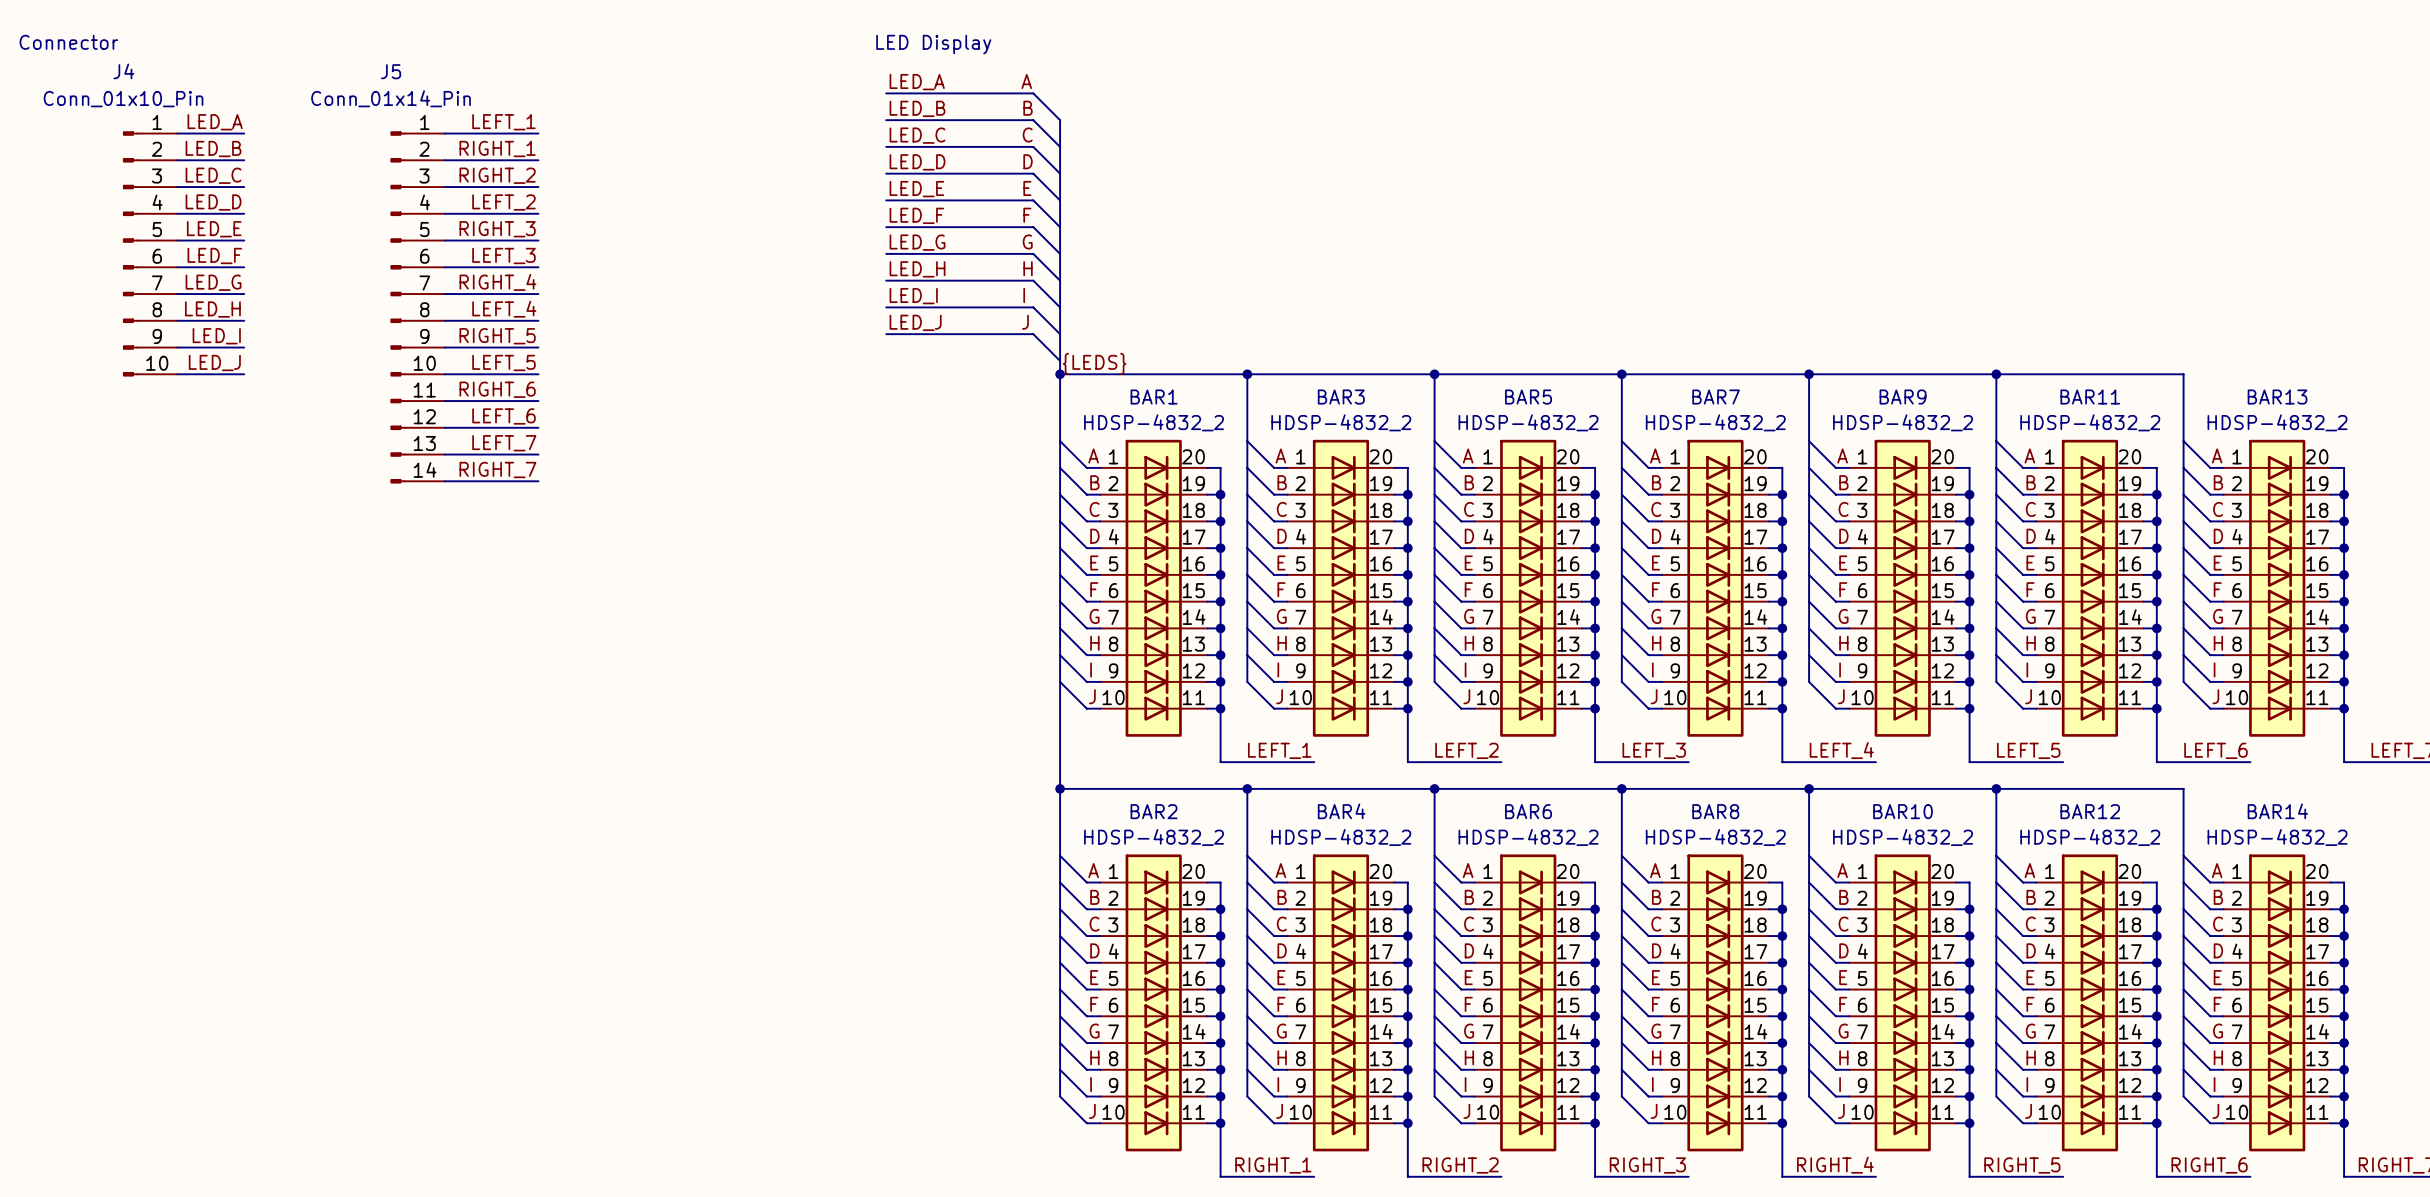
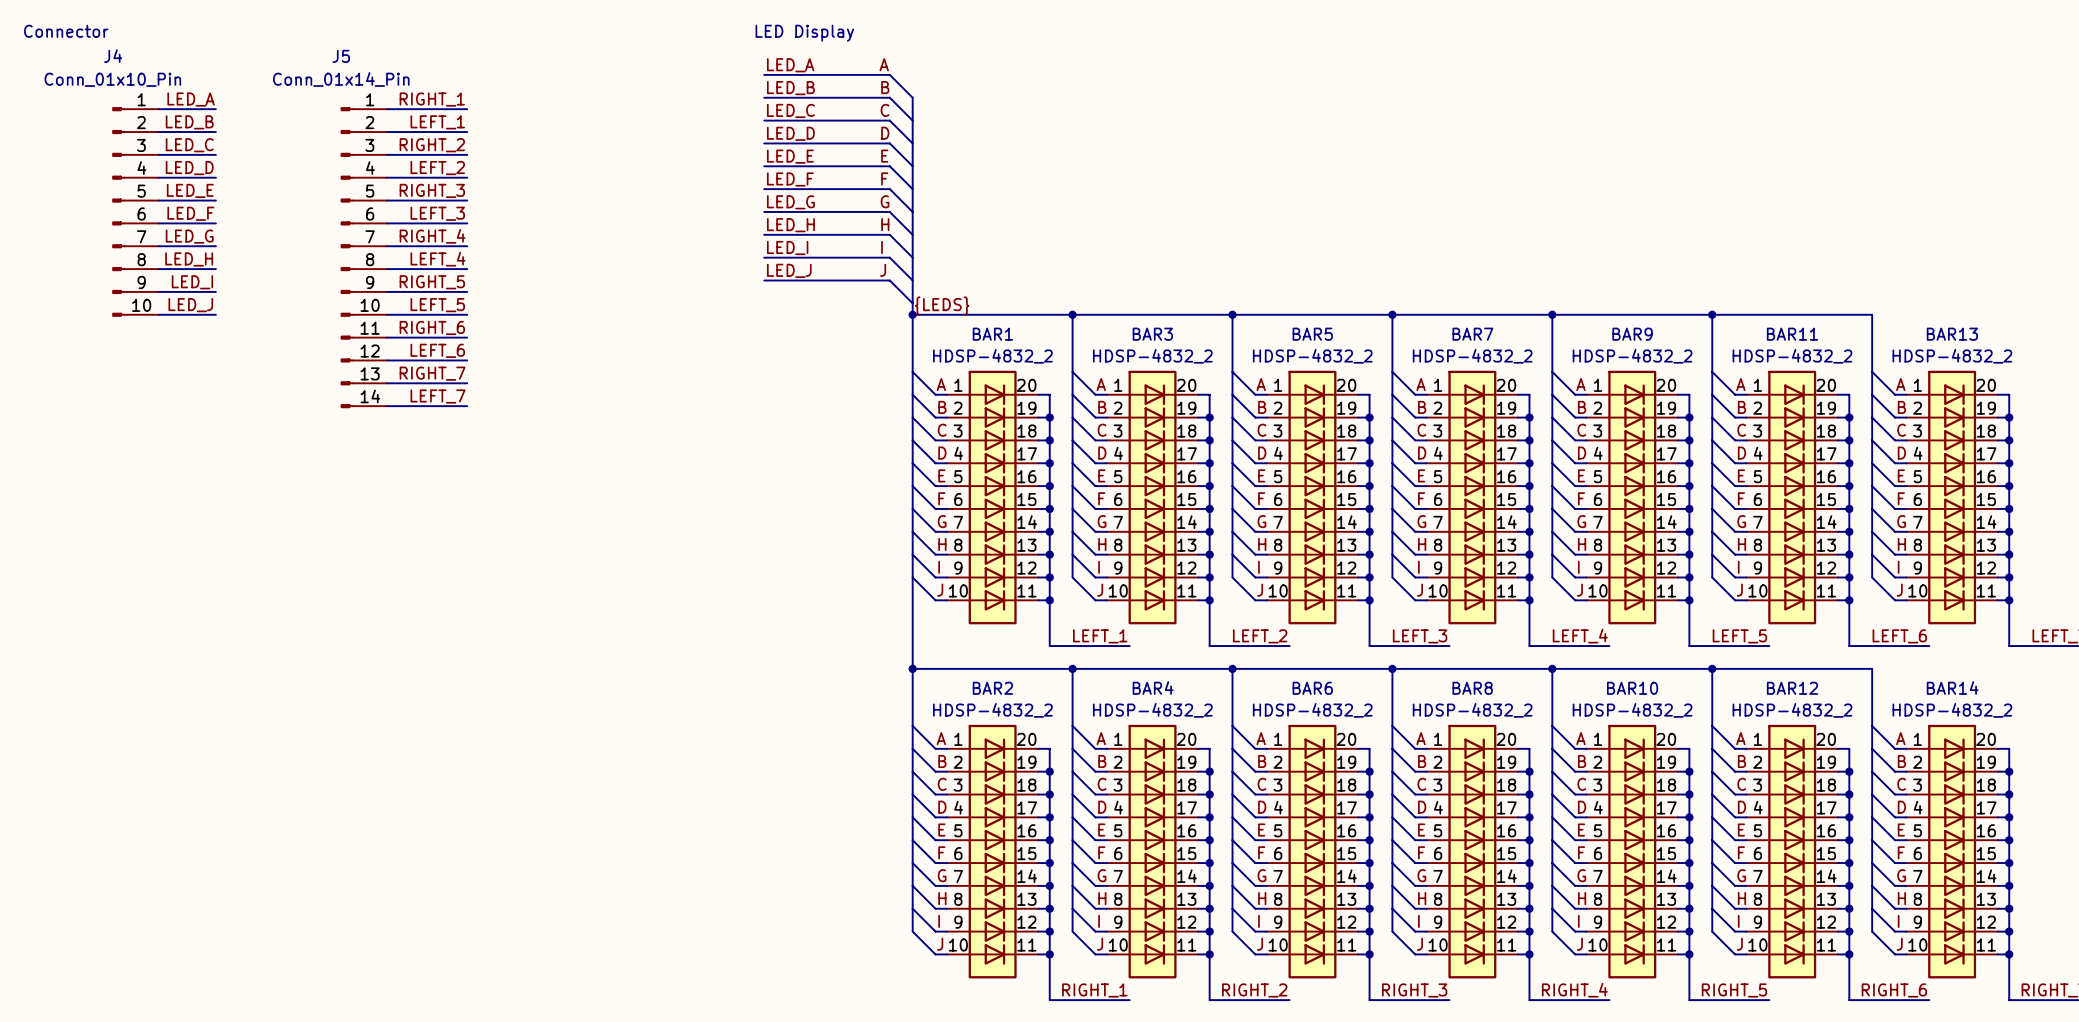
label: LEFT_1 (503, 122) -> RIGHT_1 (432, 99)
label: RIGHT_1 (497, 148) -> LEFT_1 (437, 122)
label: LEFT_7 (504, 443) -> RIGHT_7 (432, 373)
label: RIGHT_7 (497, 469) -> LEFT_7 (438, 396)

